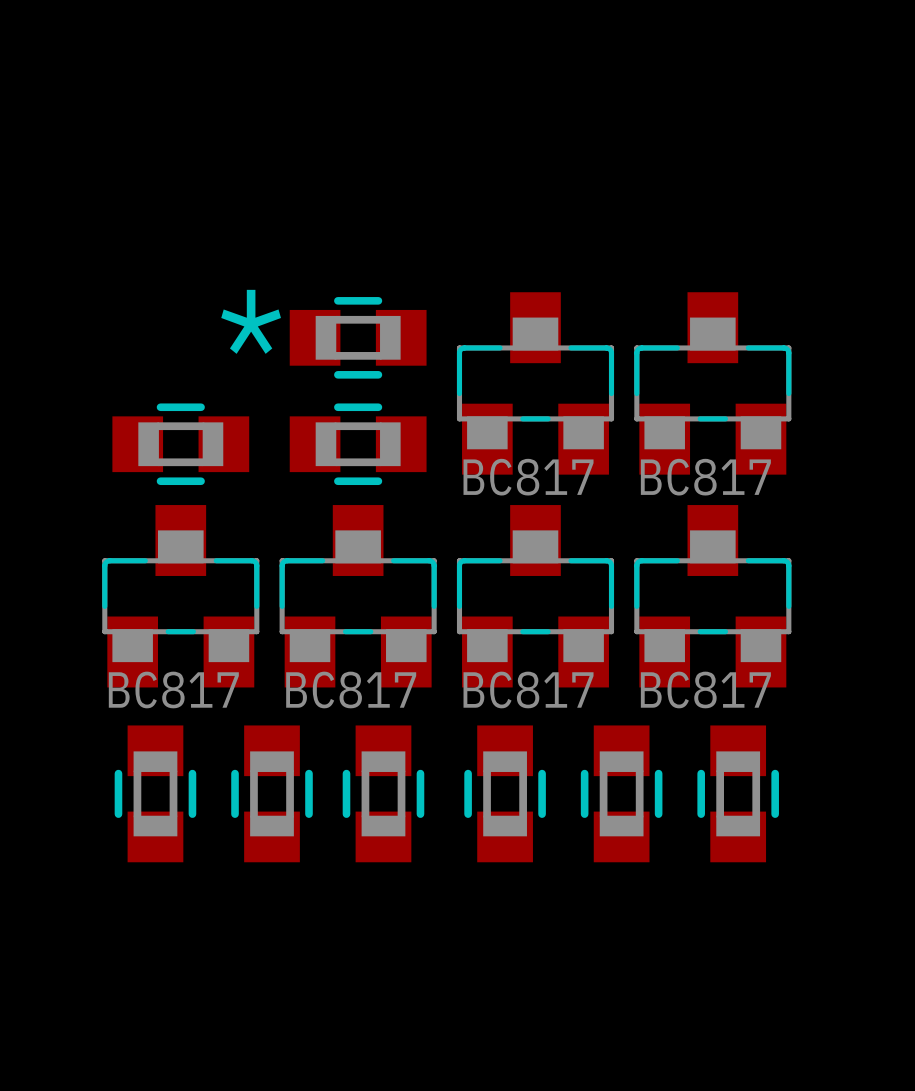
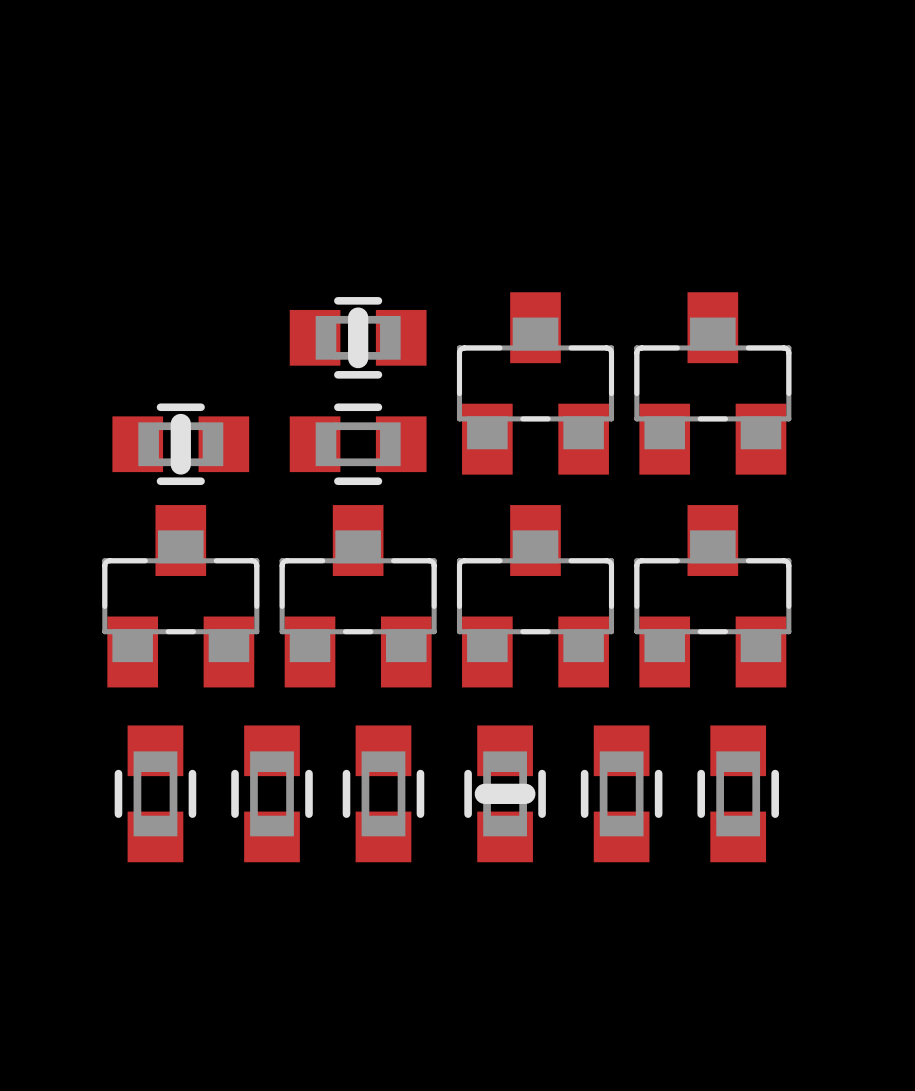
line: none -> (358, 317) (358, 358)
text: * (251, 321) -> none
line: none -> (180, 423) (180, 464)
part value: BC817 (528, 477) -> none
part value: BC817 (705, 477) -> none
part value: BC817 (173, 689) -> none
part value: BC817 (351, 689) -> none
part value: BC817 (528, 689) -> none
part value: BC817 (705, 689) -> none
line: none -> (484, 793) (525, 793)

